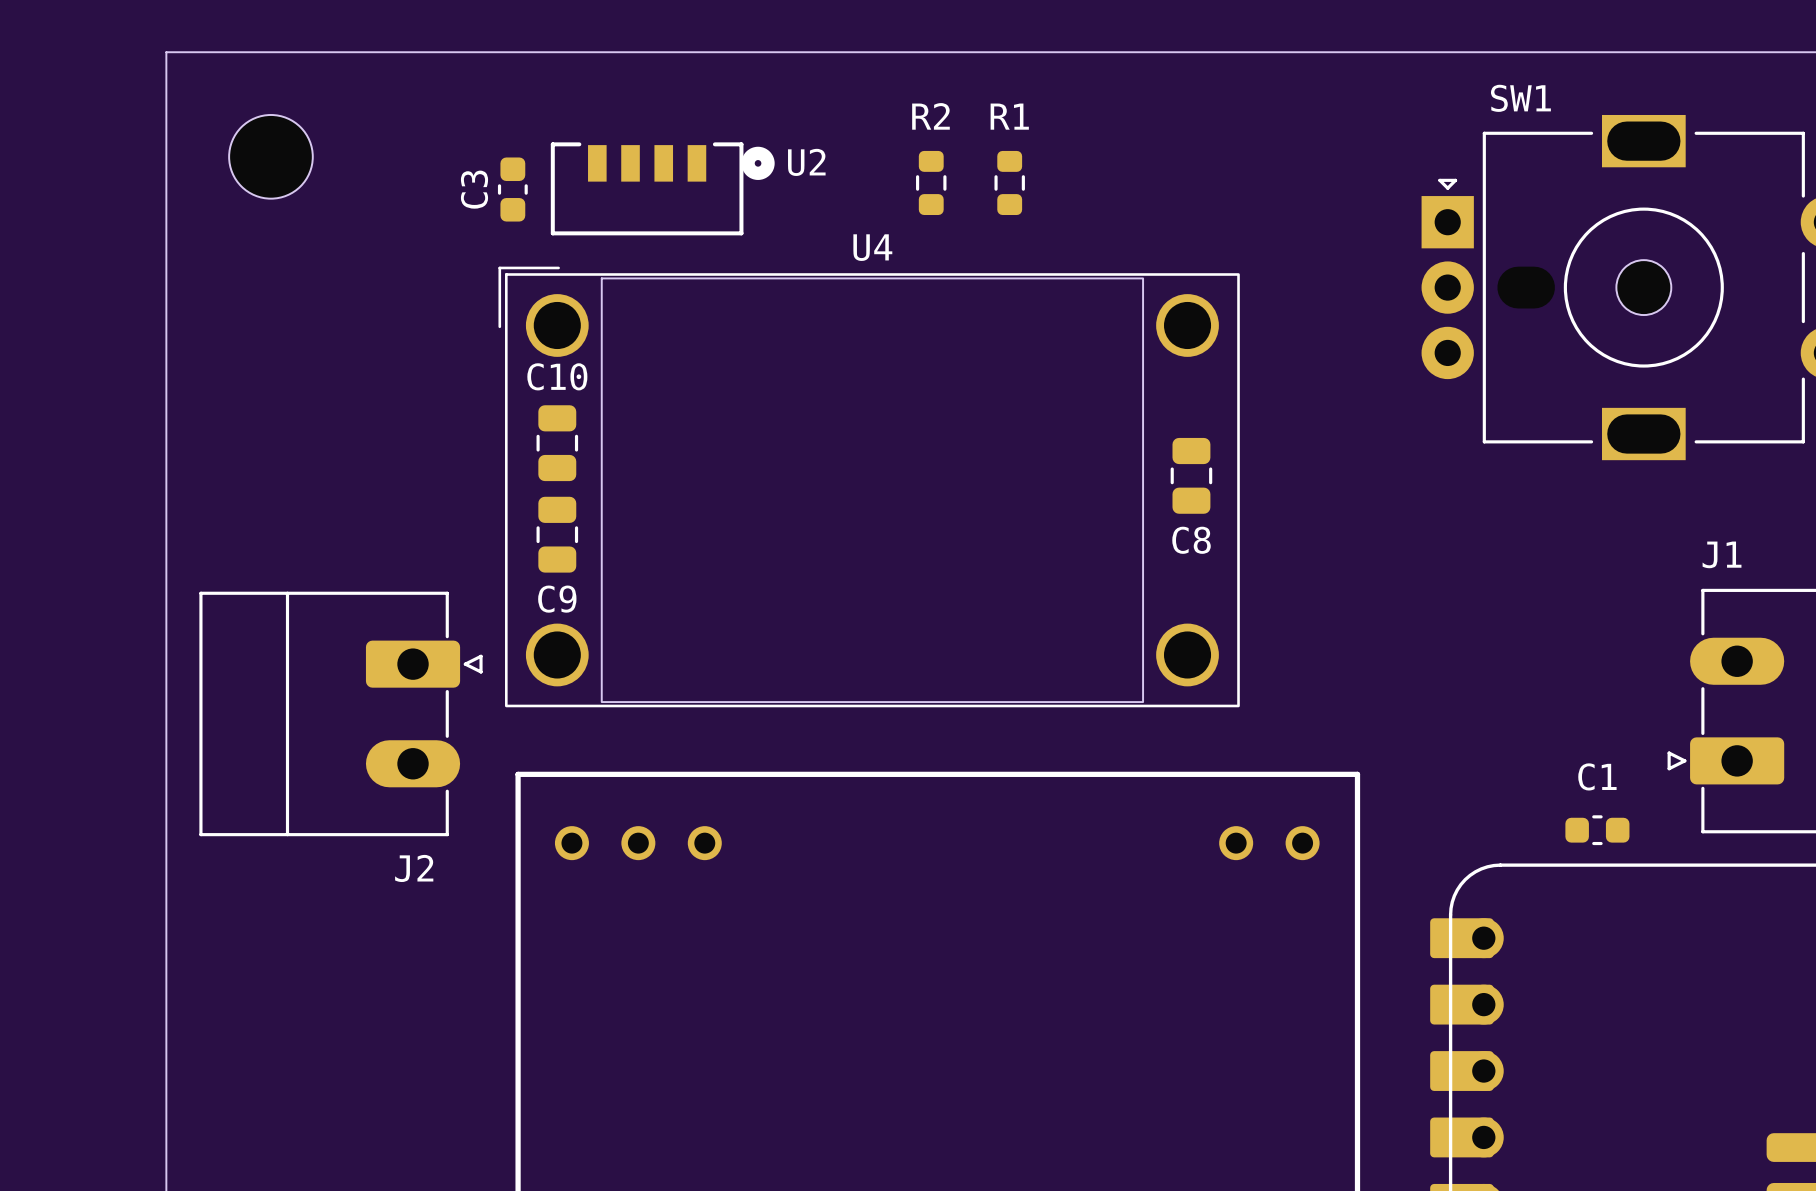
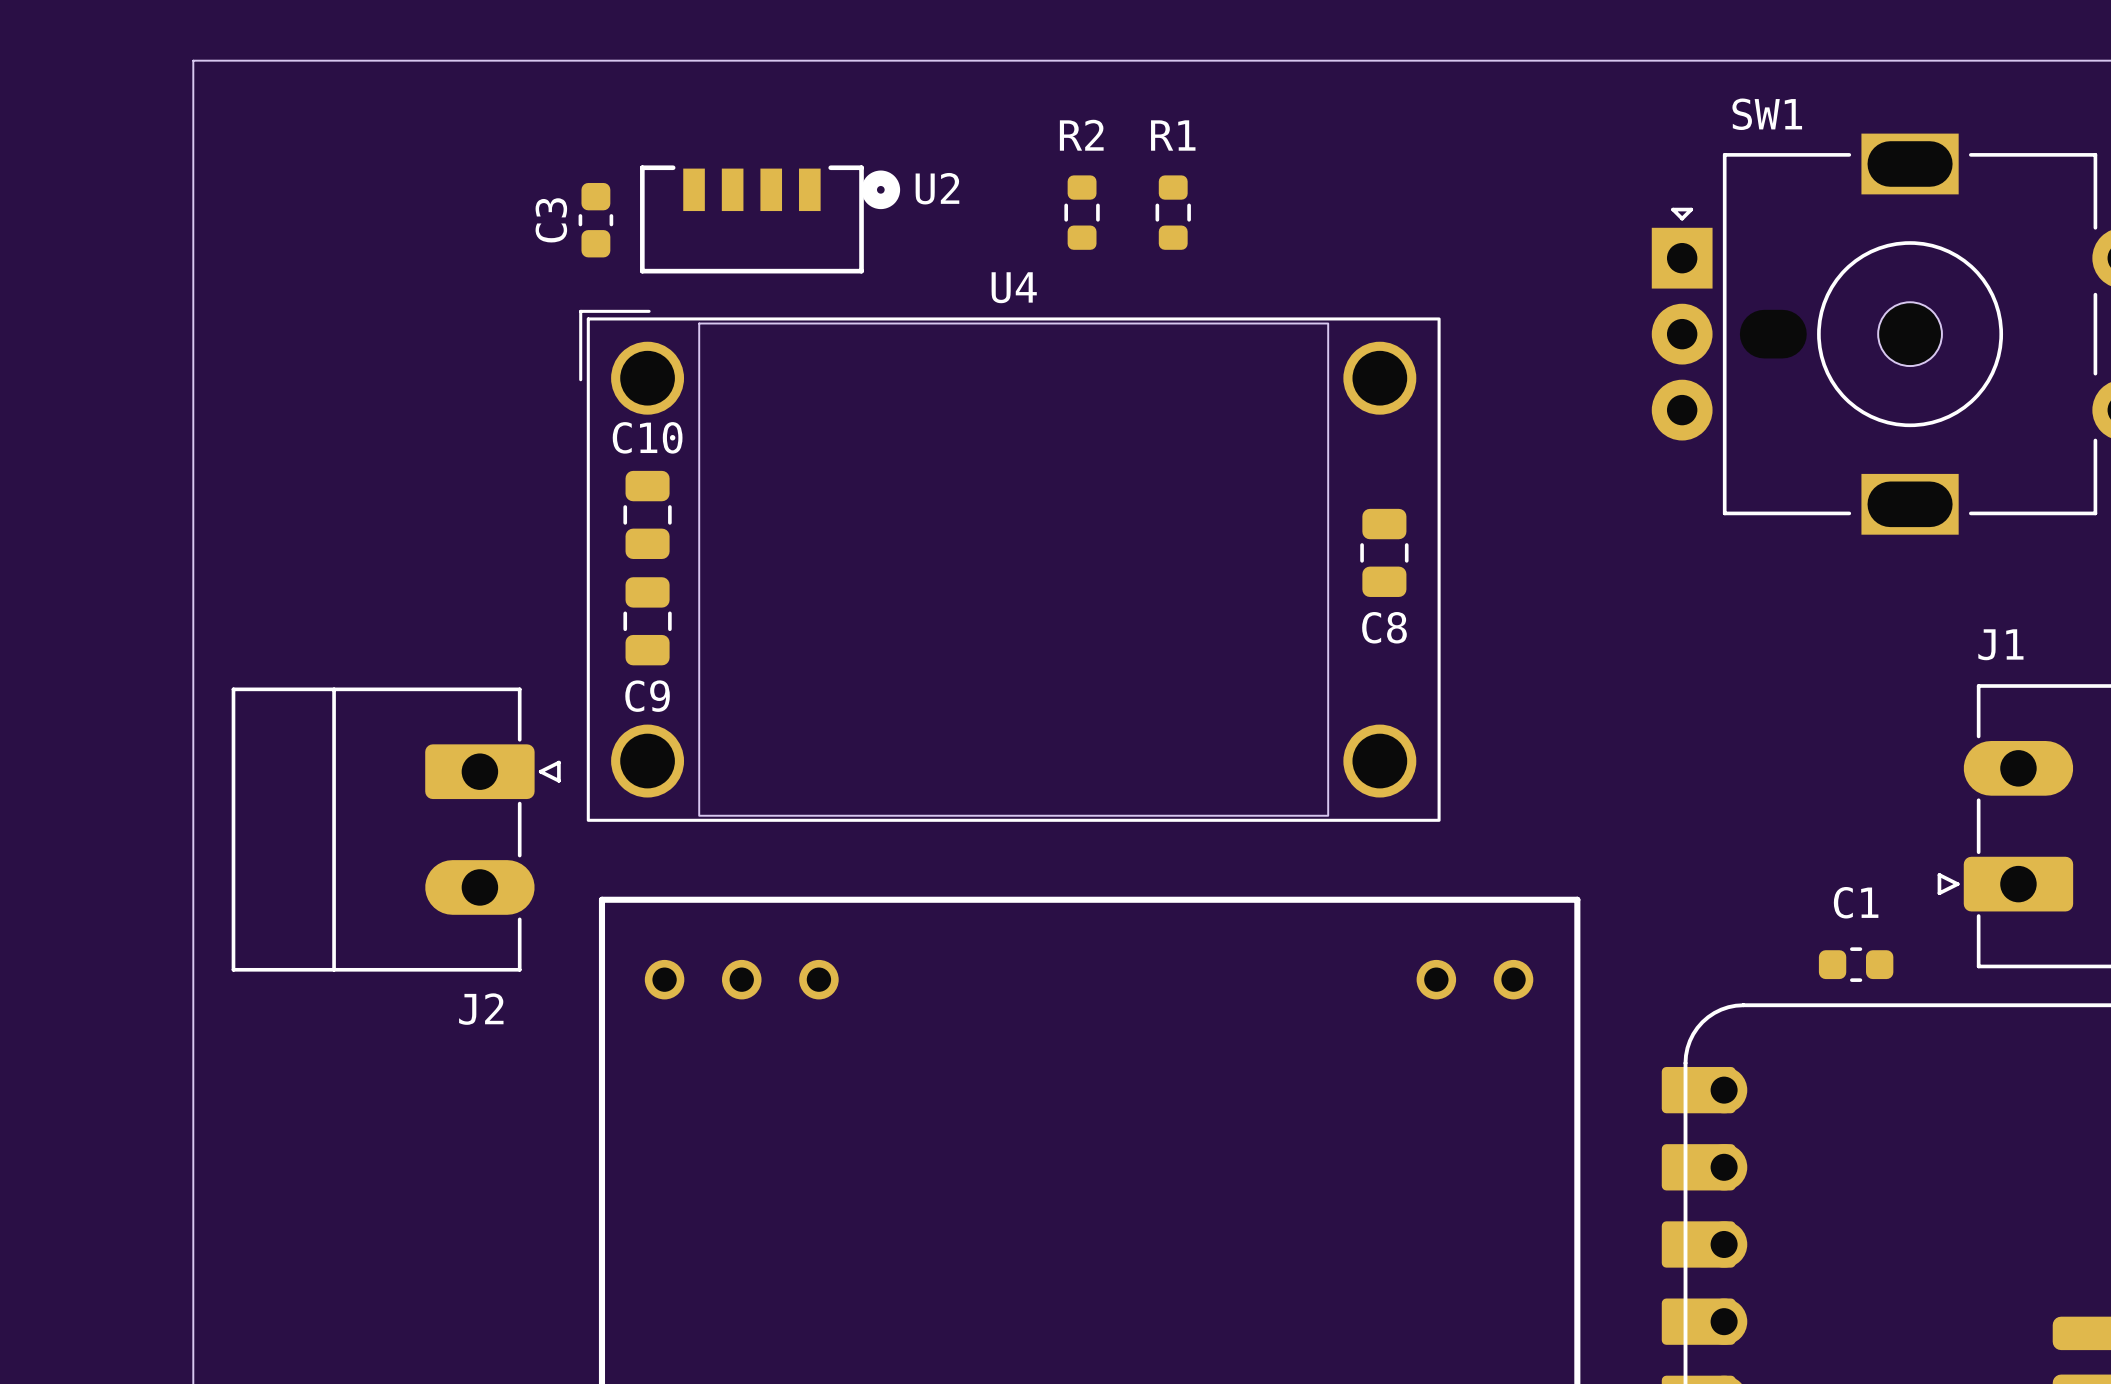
part: (270, 156) -> none

